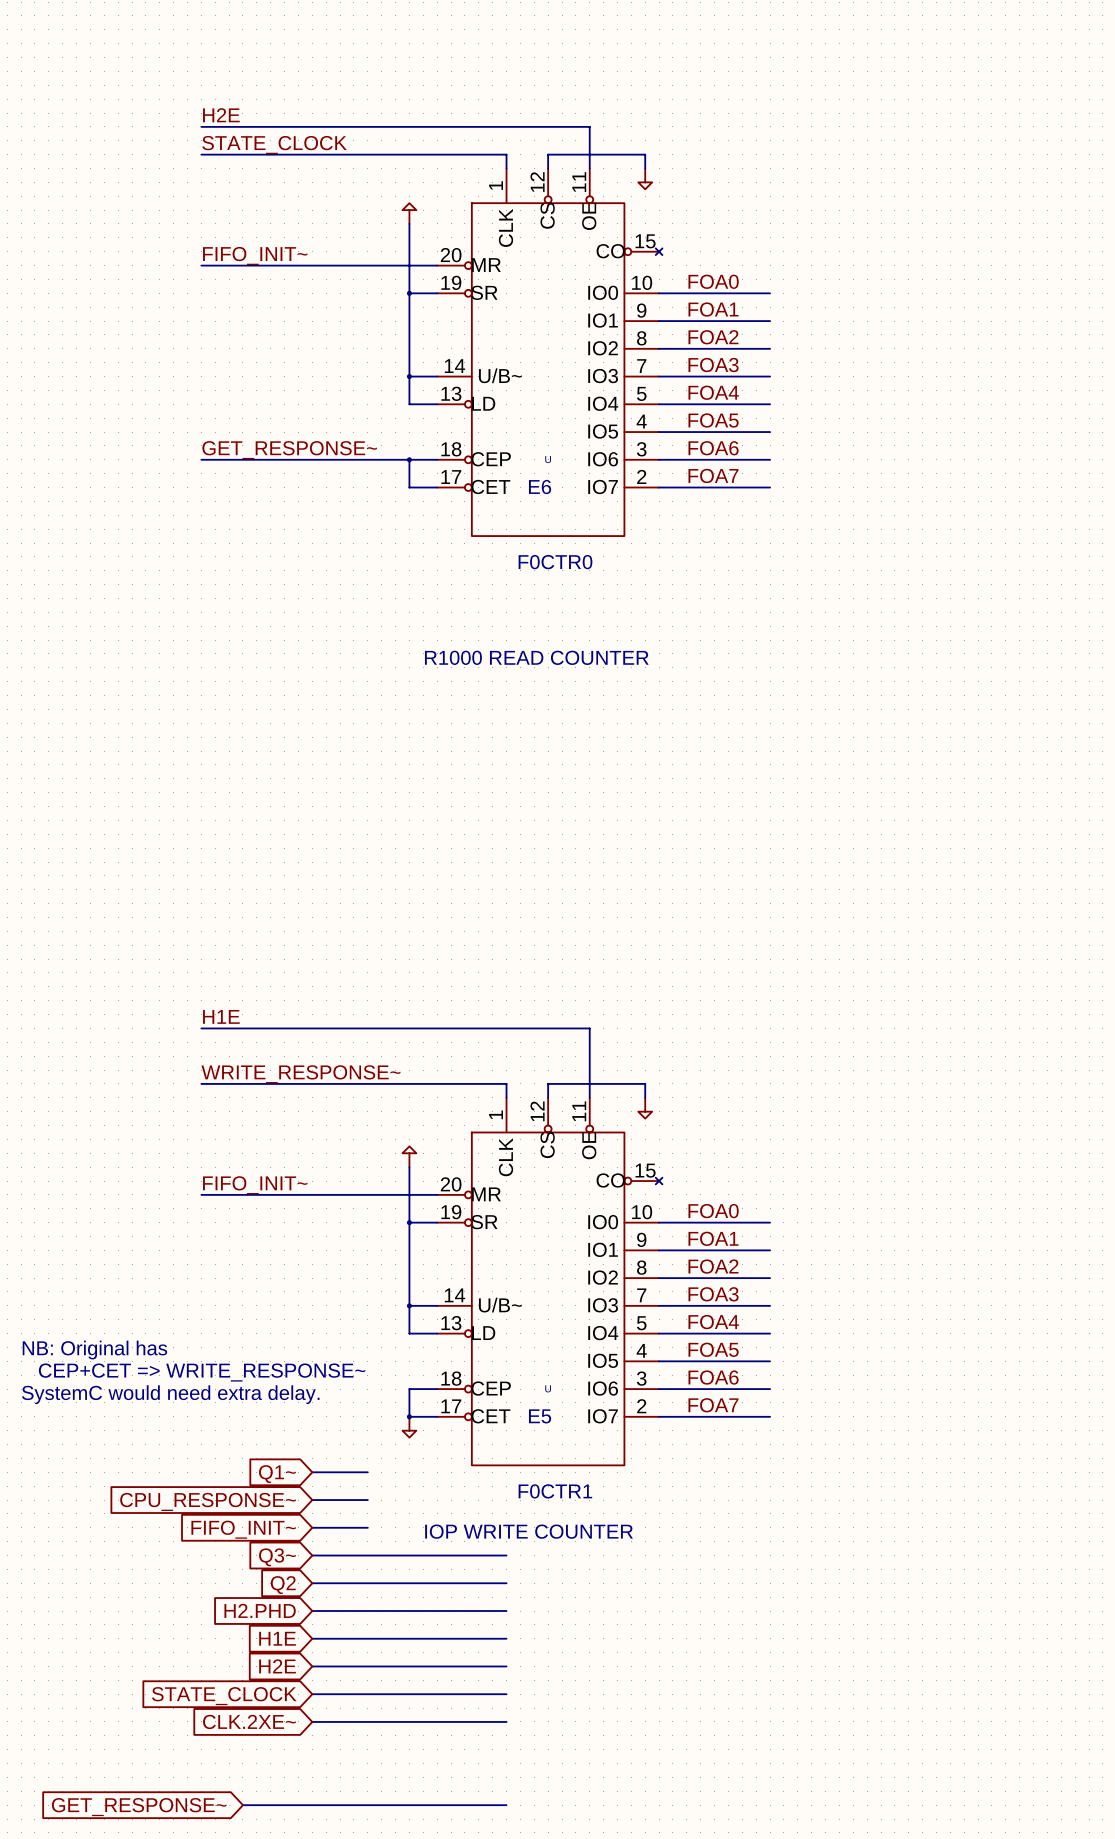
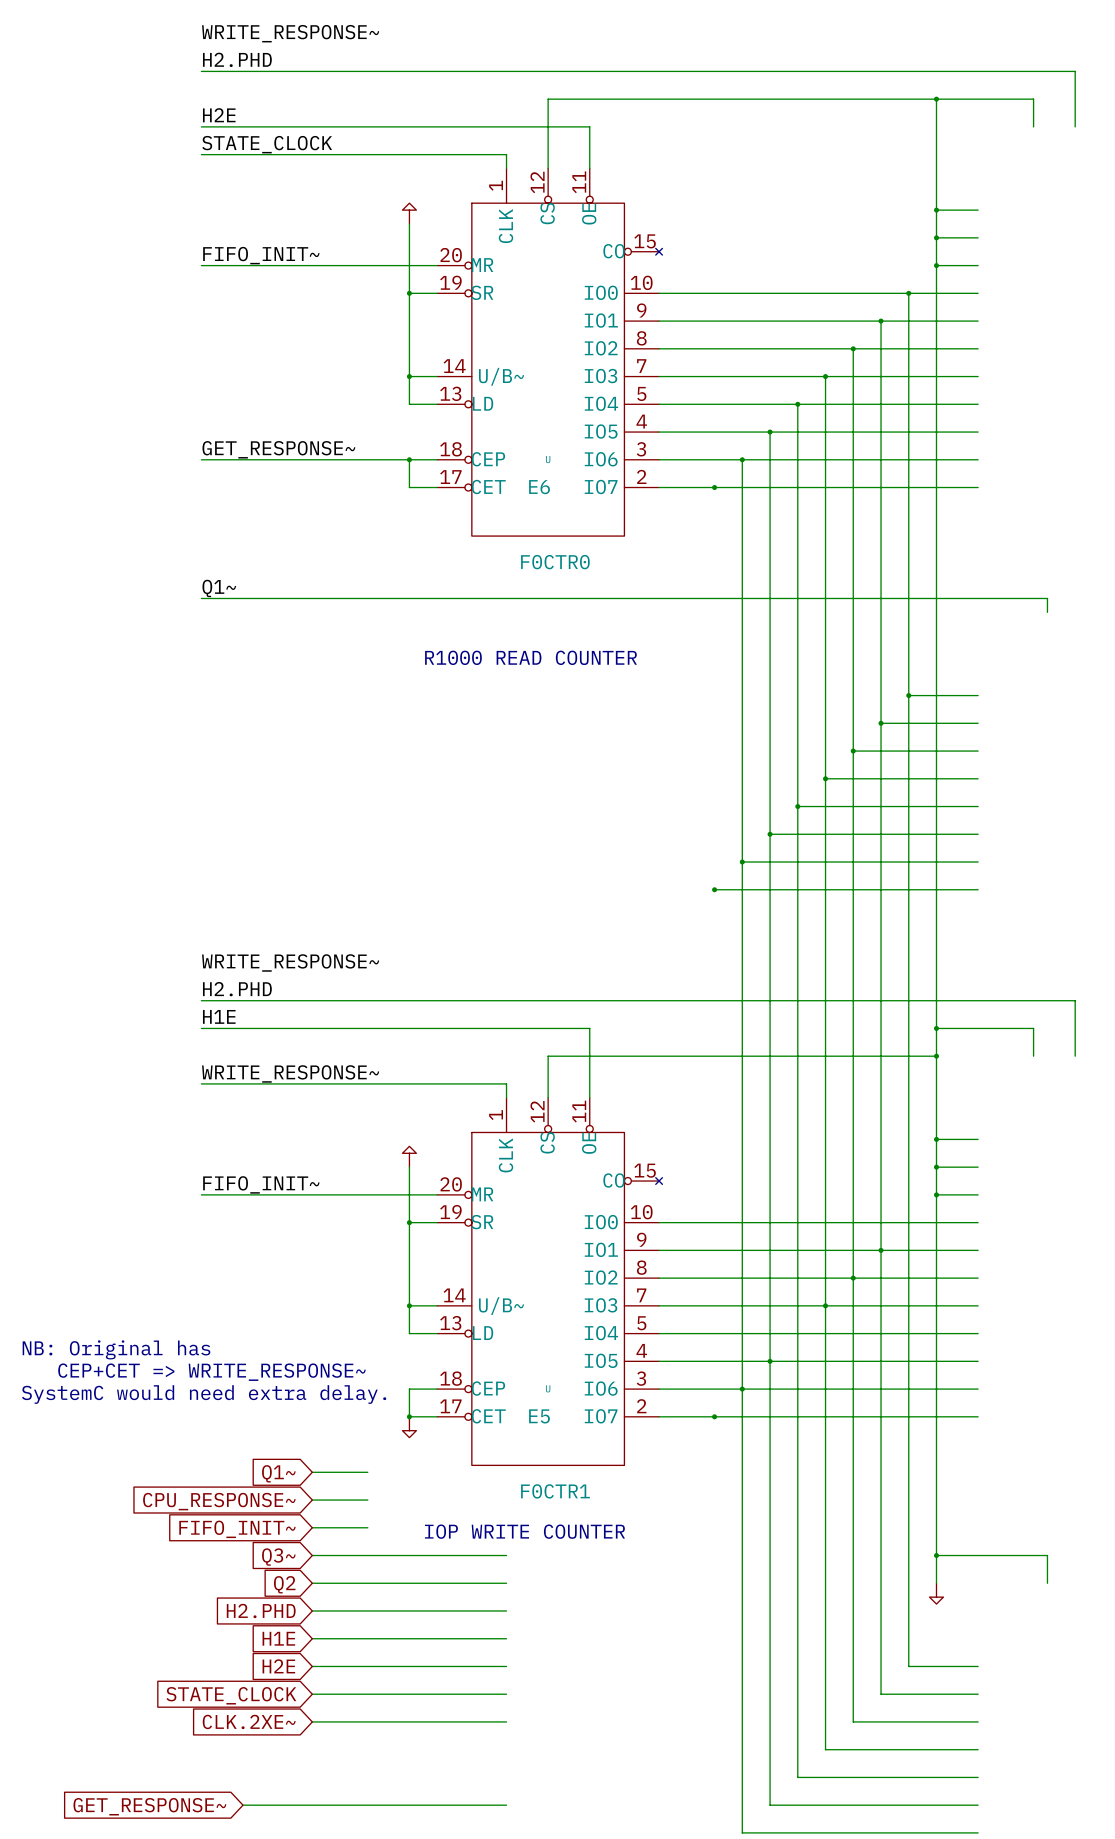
label: none -> WRITE_RESPONSE~ (290, 33)
label: none -> H2.PHD (237, 59)
wire: none -> (201, 71) (1075, 71) (1075, 126)
wire: none -> (936, 99) (936, 1583)
junction: none -> (936, 99)
wire: (548, 154) (645, 154) (645, 168) -> (548, 154) (548, 99) (1033, 99) (1033, 126)
power symbol: (645, 179) -> none
wire: none -> (936, 210) (978, 210)
junction: none -> (936, 210)
wire: none -> (936, 237) (978, 237)
junction: none -> (936, 237)
wire: none -> (936, 265) (978, 265)
junction: none -> (936, 265)
label: FOA0 (713, 281) -> none
wire: none -> (770, 293) (978, 293)
wire: none -> (908, 293) (908, 1666) (978, 1666)
junction: none -> (908, 293)
label: FOA1 (713, 309) -> none
wire: none -> (770, 321) (978, 321)
wire: none -> (881, 321) (881, 1694) (978, 1694)
junction: none -> (881, 321)
label: FOA2 (713, 337) -> none
wire: none -> (770, 348) (978, 348)
wire: none -> (853, 348) (853, 1721) (978, 1721)
junction: none -> (853, 348)
label: FOA3 (713, 365) -> none
wire: none -> (770, 376) (978, 376)
wire: none -> (825, 376) (825, 1749) (978, 1749)
junction: none -> (825, 376)
label: FOA4 (713, 392) -> none
wire: none -> (770, 404) (978, 404)
wire: none -> (797, 404) (797, 1777) (978, 1777)
junction: none -> (797, 404)
label: FOA5 (713, 420) -> none
junction: none -> (770, 432)
wire: none -> (978, 432) (770, 432) (770, 1805) (978, 1805)
label: FOA6 (713, 448) -> none
wire: none -> (742, 459) (742, 1832) (978, 1832)
junction: none -> (742, 459)
wire: none -> (770, 459) (978, 459)
label: FOA7 (713, 475) -> none
junction: none -> (714, 487)
wire: none -> (770, 487) (978, 487)
label: none -> Q1~ (219, 588)
wire: none -> (201, 598) (1047, 598) (1047, 612)
wire: none -> (908, 695) (978, 695)
junction: none -> (908, 695)
wire: none -> (881, 723) (978, 723)
junction: none -> (881, 723)
wire: none -> (853, 751) (978, 751)
junction: none -> (853, 751)
wire: none -> (825, 778) (978, 778)
junction: none -> (825, 778)
wire: none -> (797, 806) (978, 806)
junction: none -> (797, 806)
wire: none -> (770, 834) (978, 834)
junction: none -> (770, 834)
wire: none -> (742, 862) (978, 862)
junction: none -> (742, 862)
wire: none -> (714, 889) (978, 889)
junction: none -> (714, 889)
label: none -> WRITE_RESPONSE~ (290, 962)
label: none -> H2.PHD (237, 989)
wire: none -> (201, 1000) (1075, 1000) (1075, 1056)
wire: none -> (936, 1028) (1033, 1028) (1033, 1056)
junction: none -> (936, 1028)
junction: none -> (936, 1056)
wire: (548, 1083) (645, 1083) (645, 1097) -> (548, 1083) (548, 1056) (936, 1056)
power symbol: (645, 1108) -> none
wire: none -> (936, 1139) (978, 1139)
junction: none -> (936, 1139)
wire: none -> (936, 1167) (978, 1167)
junction: none -> (936, 1167)
wire: none -> (936, 1194) (978, 1194)
junction: none -> (936, 1194)
label: FOA0 (713, 1211) -> none
wire: none -> (770, 1222) (978, 1222)
label: FOA1 (713, 1238) -> none
wire: none -> (770, 1250) (978, 1250)
junction: none -> (881, 1250)
label: FOA2 (713, 1266) -> none
wire: none -> (770, 1278) (978, 1278)
junction: none -> (853, 1278)
label: FOA3 (713, 1294) -> none
wire: none -> (770, 1305) (978, 1305)
junction: none -> (825, 1305)
label: FOA4 (713, 1322) -> none
wire: none -> (770, 1333) (978, 1333)
label: FOA5 (713, 1349) -> none
wire: none -> (770, 1361) (978, 1361)
junction: none -> (770, 1361)
label: FOA6 (713, 1377) -> none
junction: none -> (742, 1389)
wire: none -> (770, 1389) (978, 1389)
label: FOA7 (713, 1405) -> none
junction: none -> (714, 1416)
wire: none -> (770, 1416) (978, 1416)
wire: none -> (936, 1555) (1047, 1555) (1047, 1583)
junction: none -> (936, 1555)
power symbol: none -> (936, 1593)

